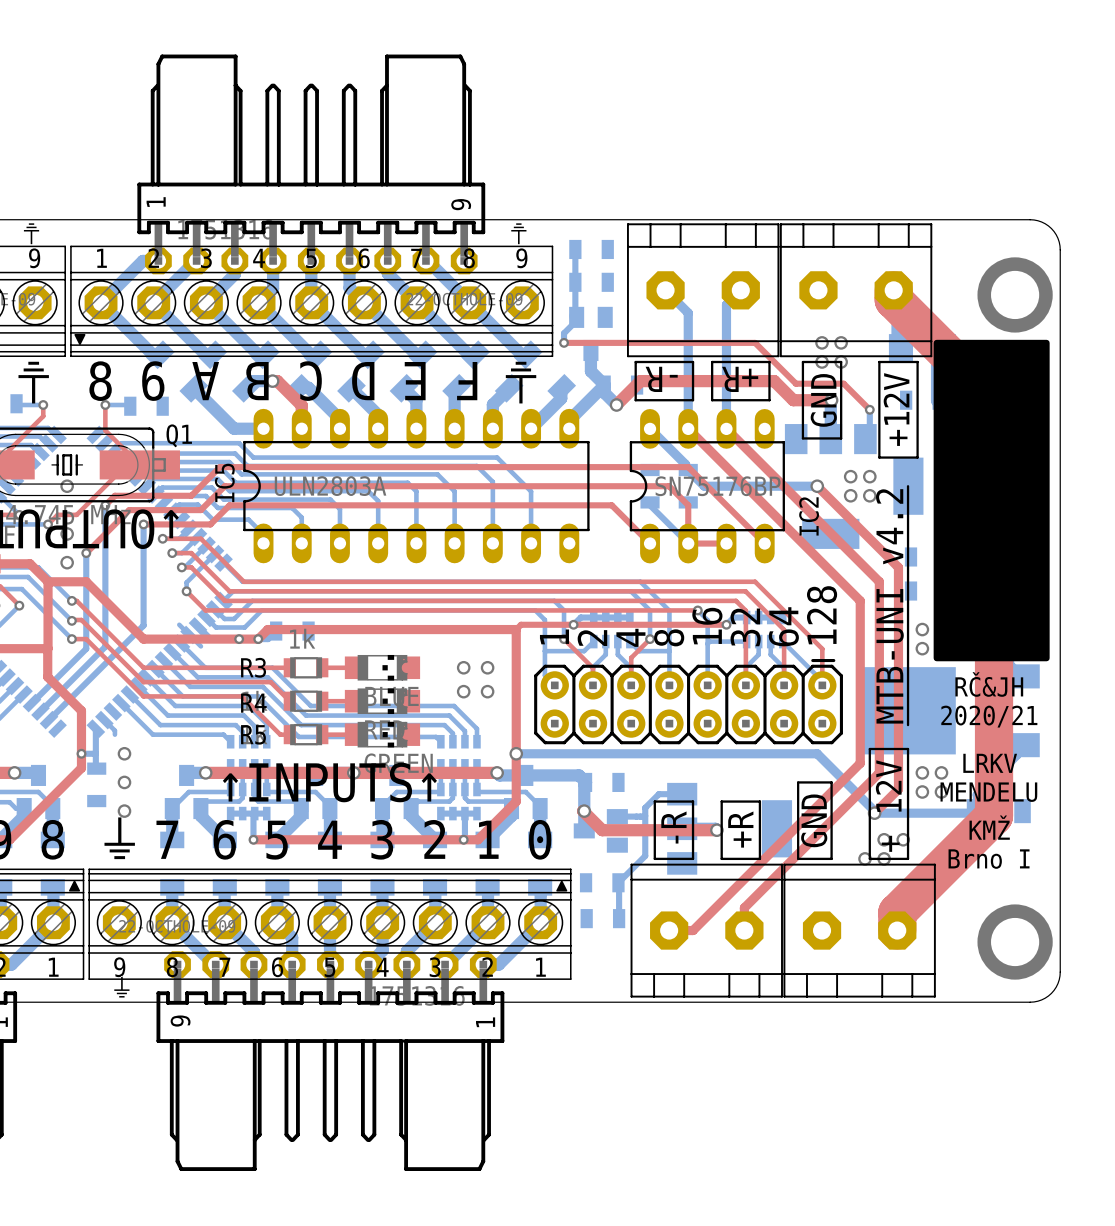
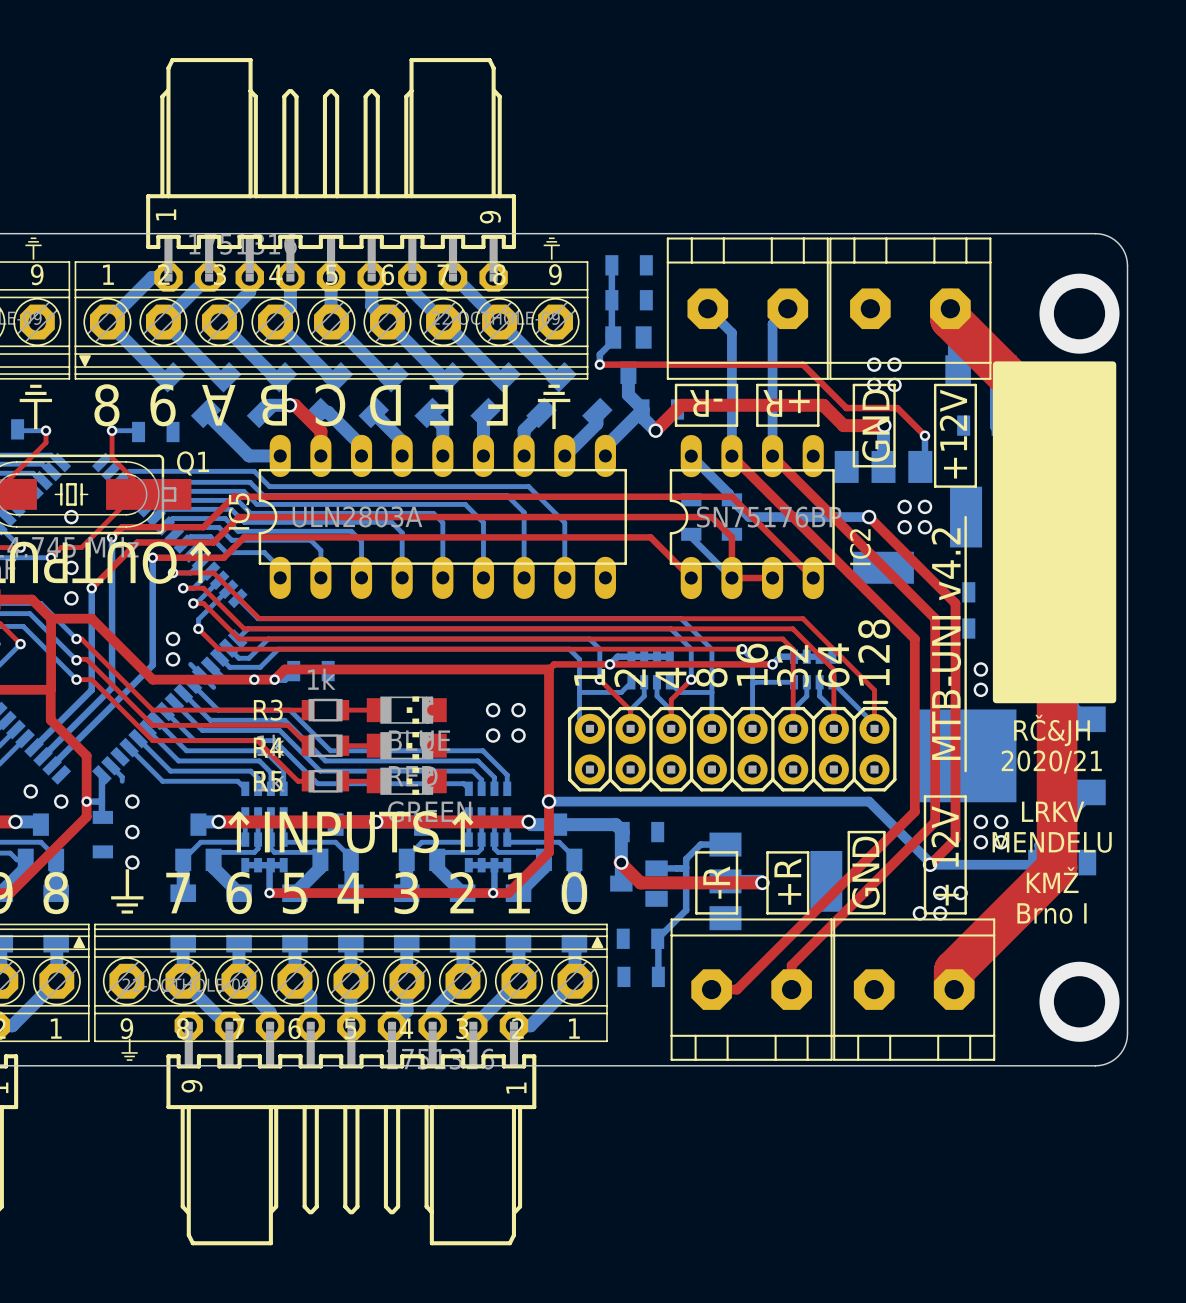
via: none -> (173, 639)
via: none -> (173, 659)
via: none -> (30, 791)
via: none -> (61, 801)

